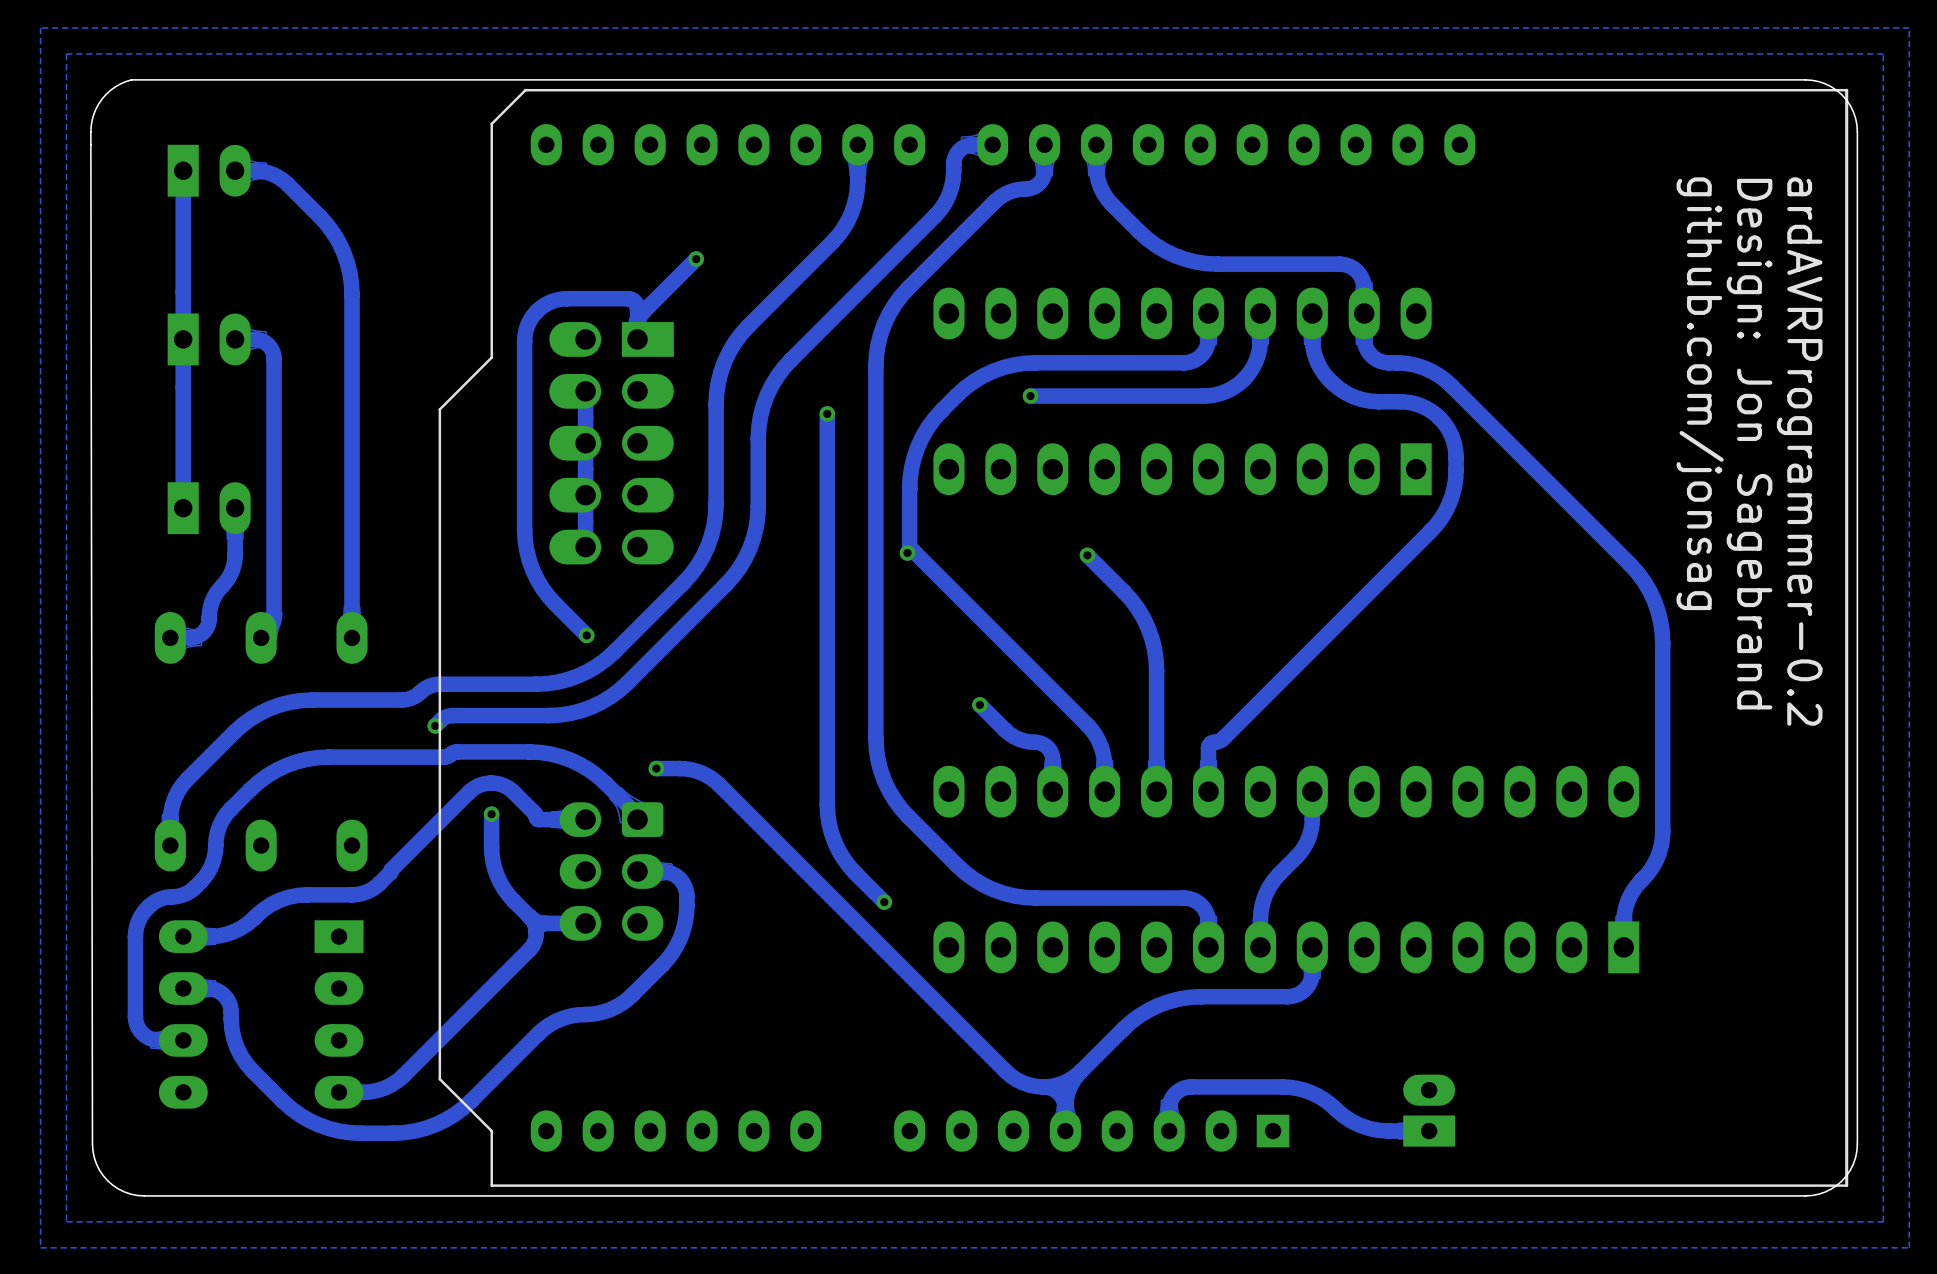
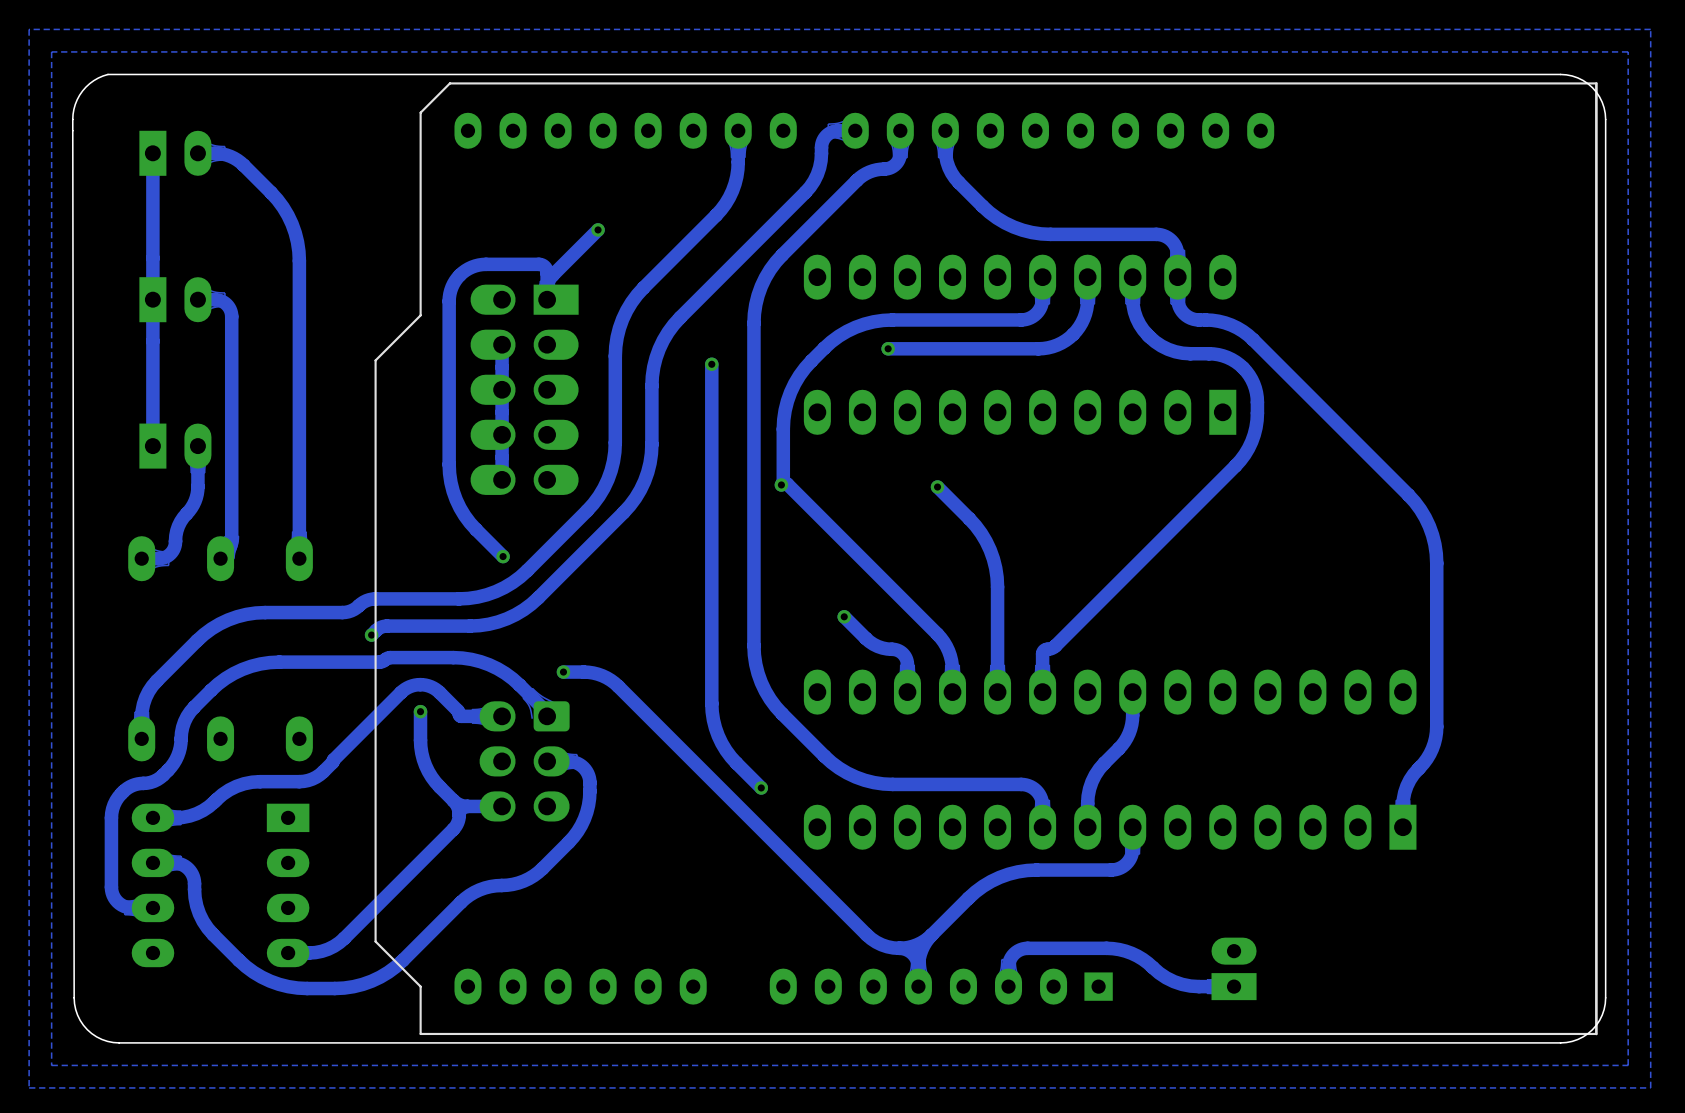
text: github.com/jonsag (1700, 393) -> none
text: Design: Jon Sagebrand (1749, 444) -> none
text: ardAVRProgrammer-0.2 (1799, 451) -> none

